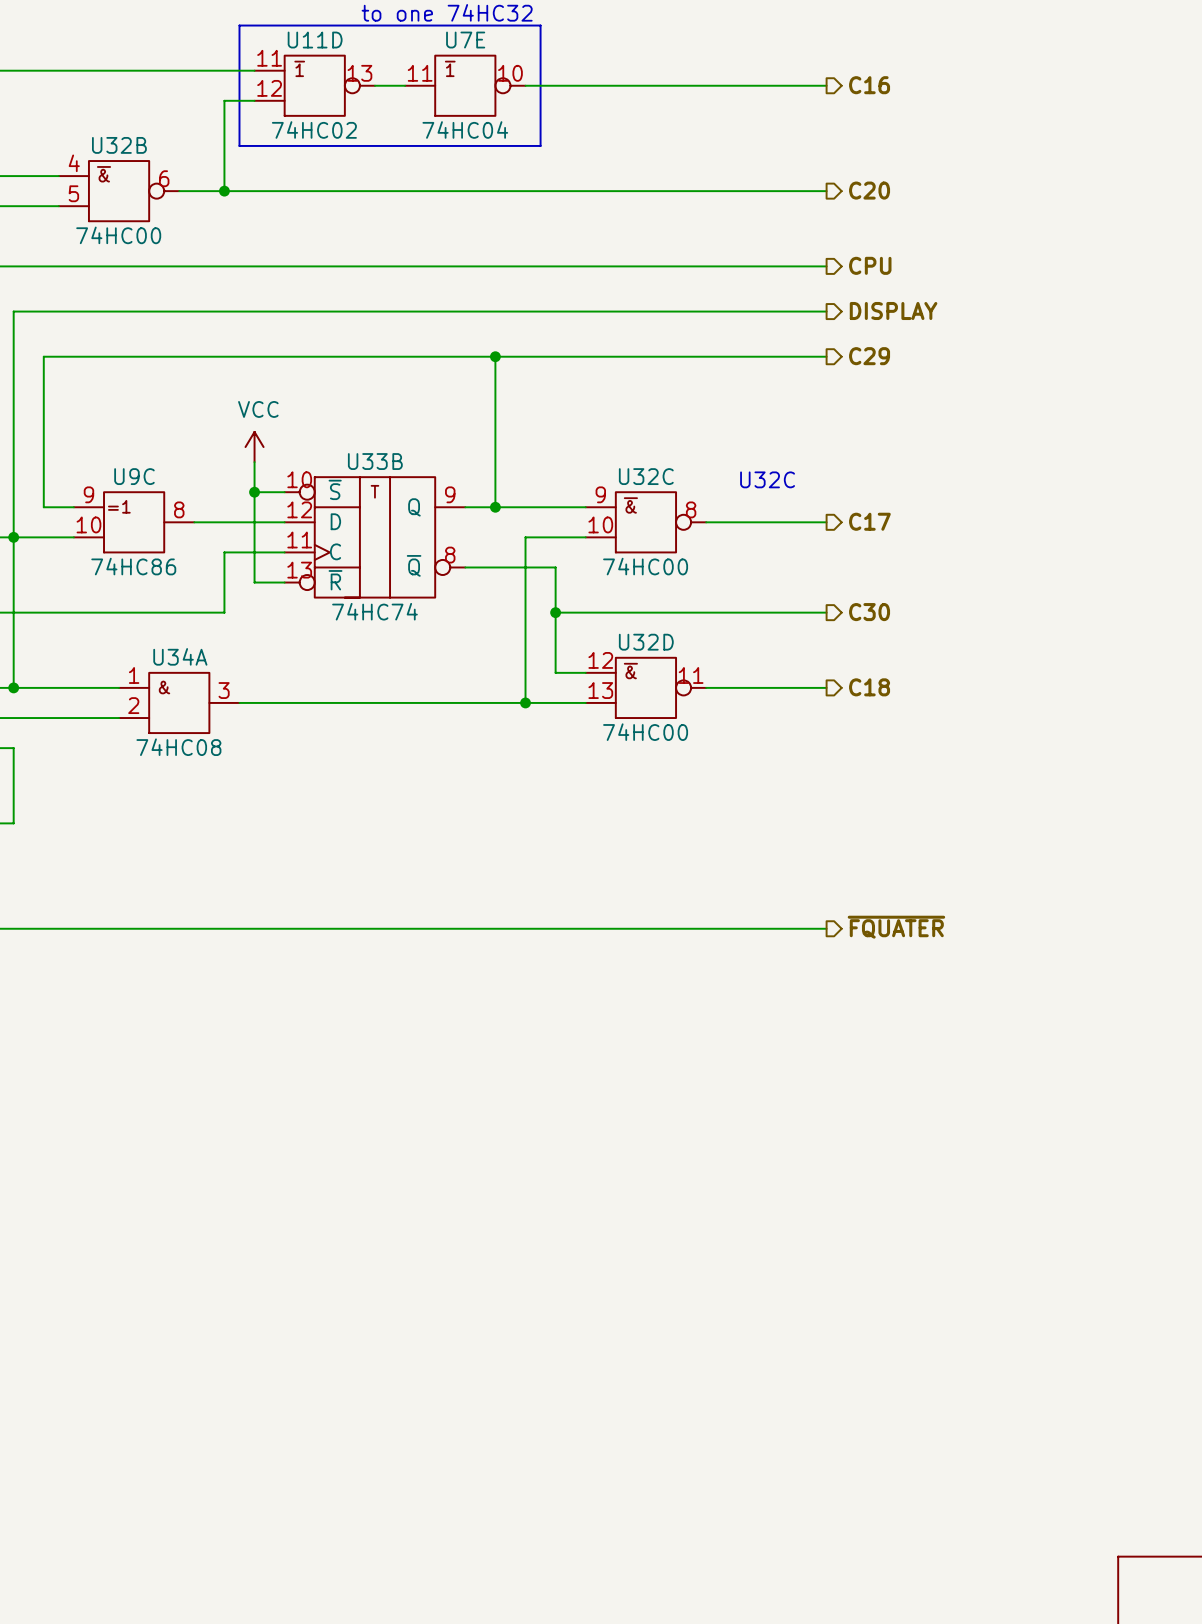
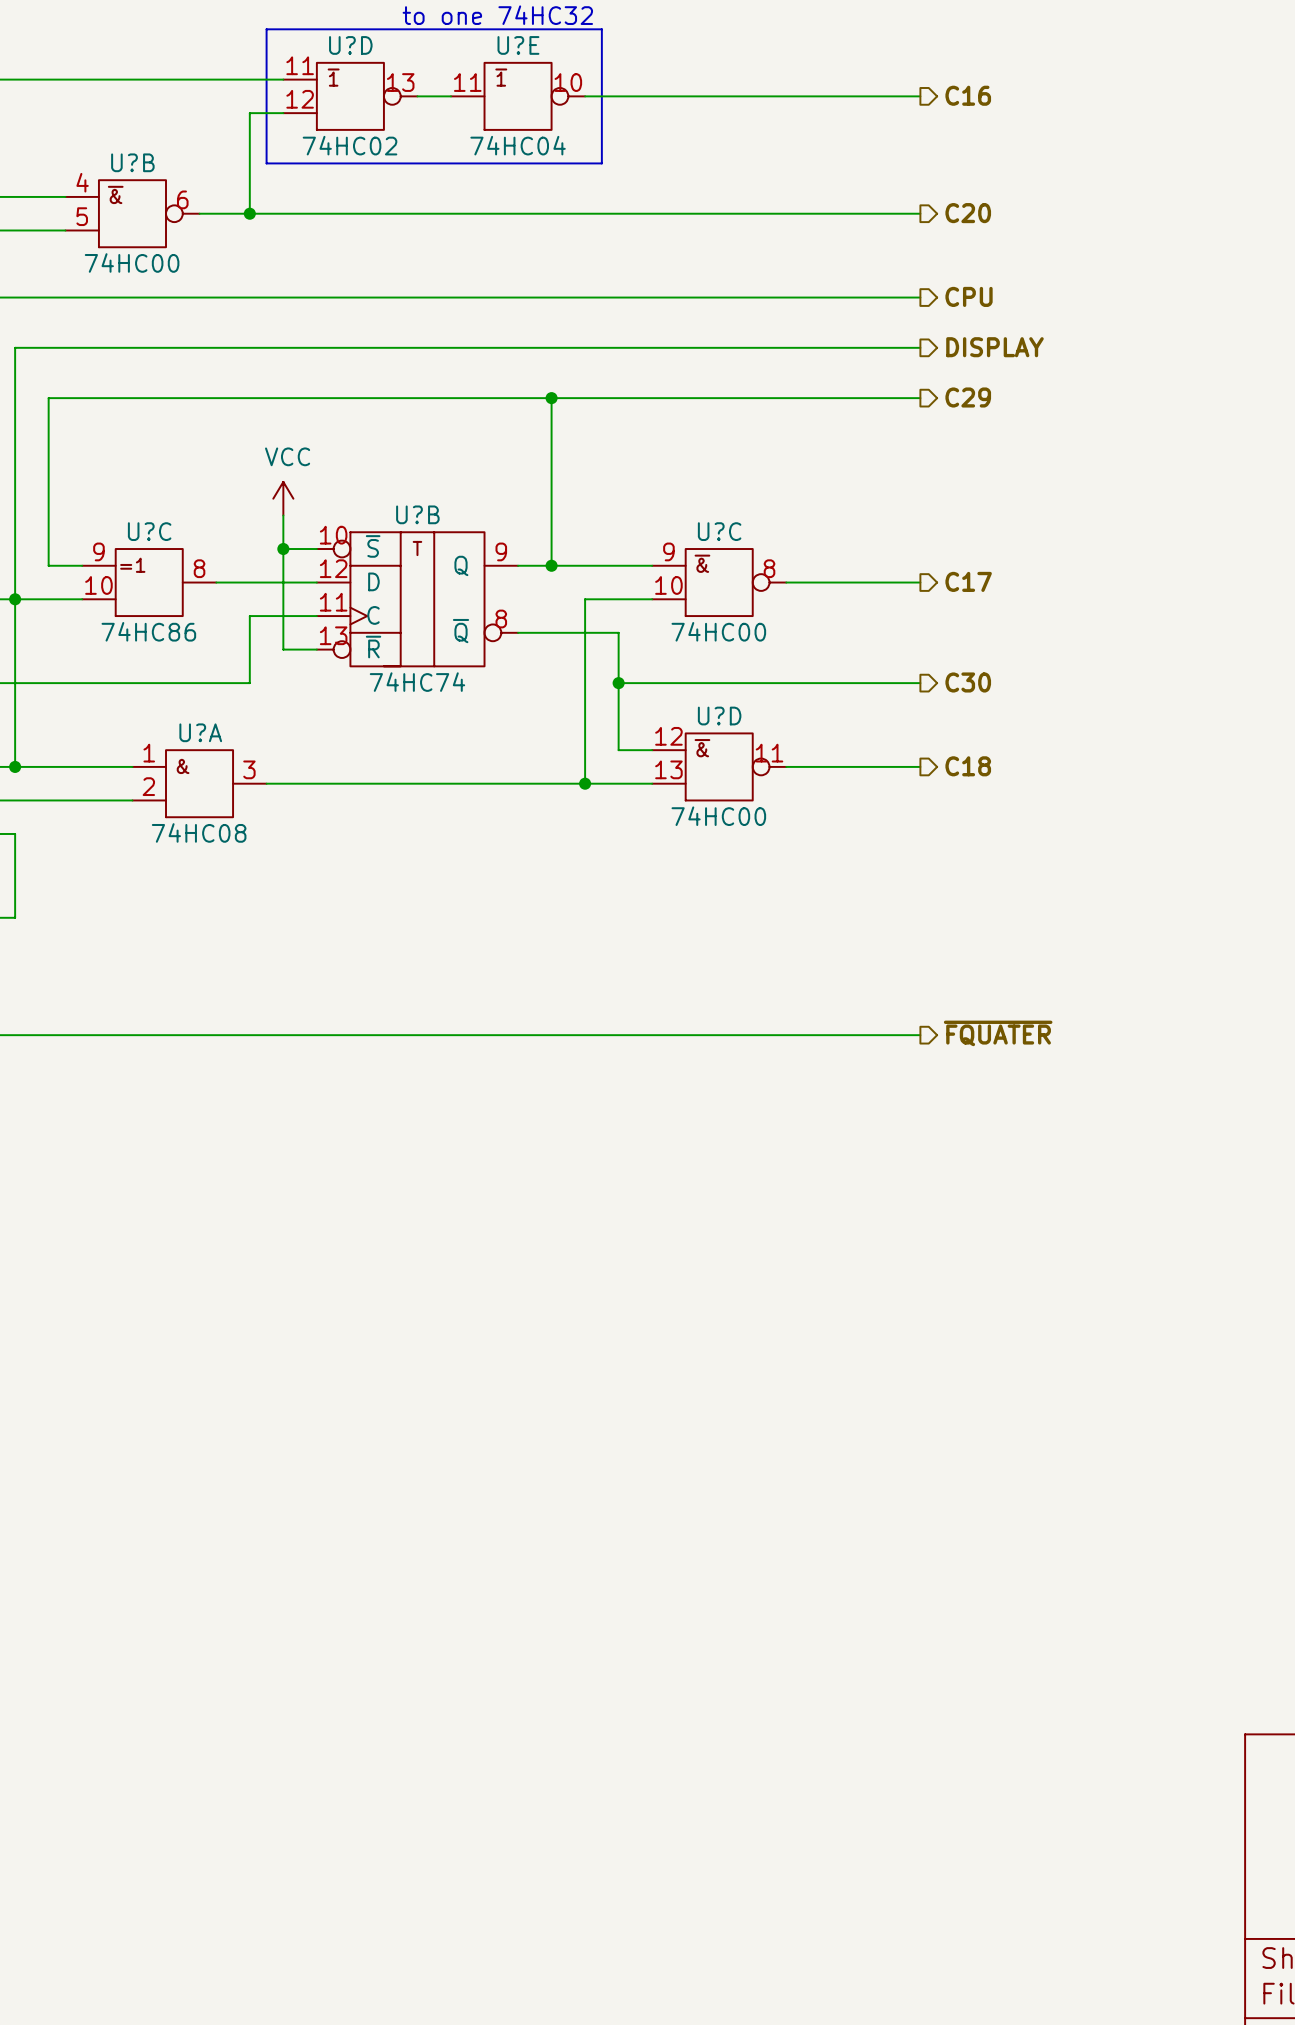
U11D name: U11D (315, 40) -> U?D (350, 45)
U7E name: U7E (465, 40) -> U?E (518, 45)
U32B name: U32B (119, 145) -> U?B (132, 162)
U33B name: U33B (375, 461) -> U?B (417, 514)
U9C name: U9C (134, 476) -> U?C (149, 531)
U32C name: U32C (646, 476) -> U?C (719, 531)
text: U32C (767, 479) -> none
U32D name: U32D (646, 642) -> U?D (719, 716)
U34A name: U34A (180, 656) -> U?A (200, 732)

